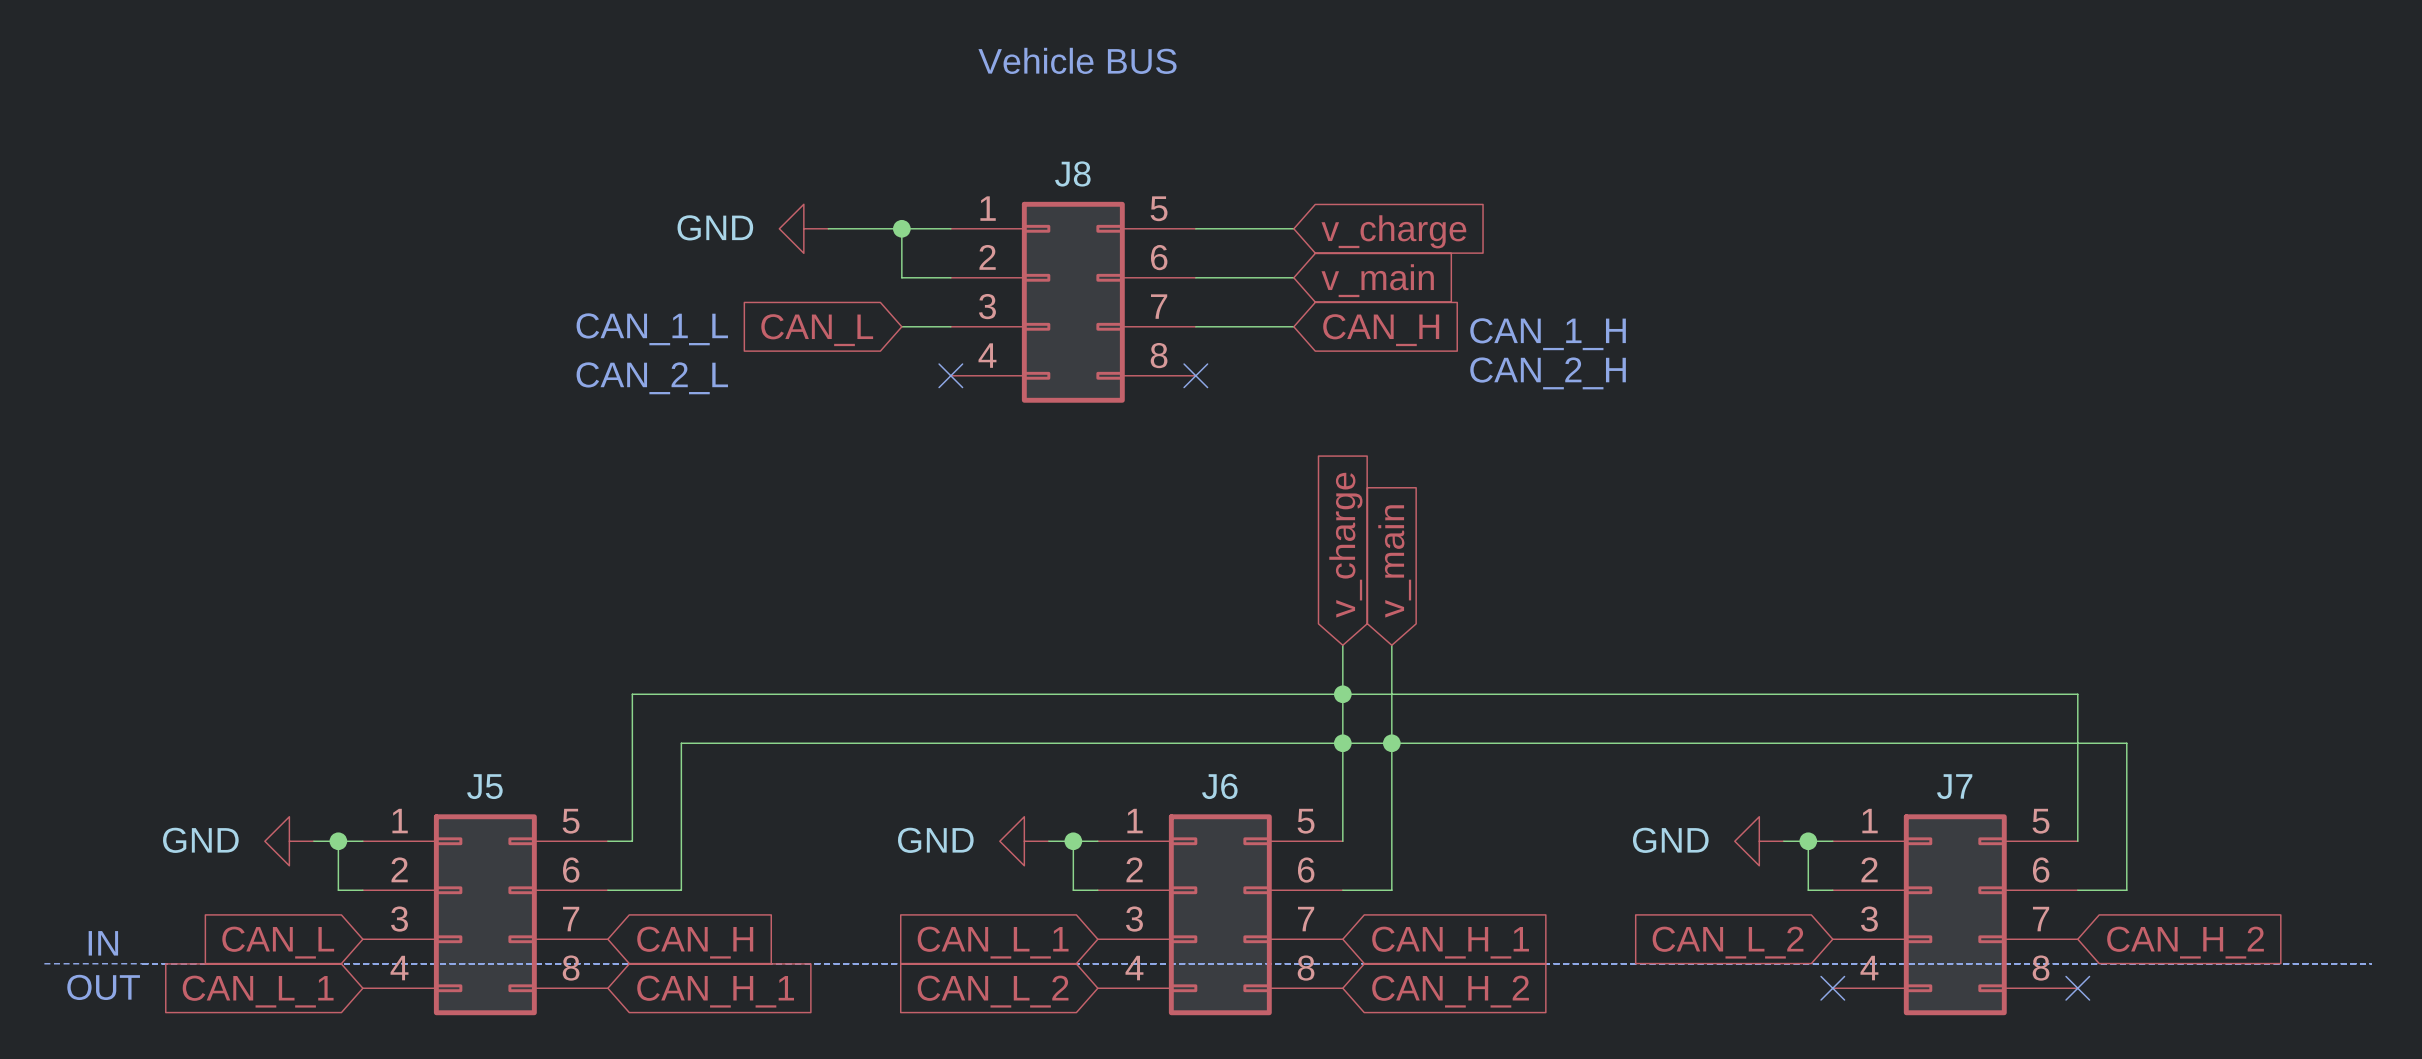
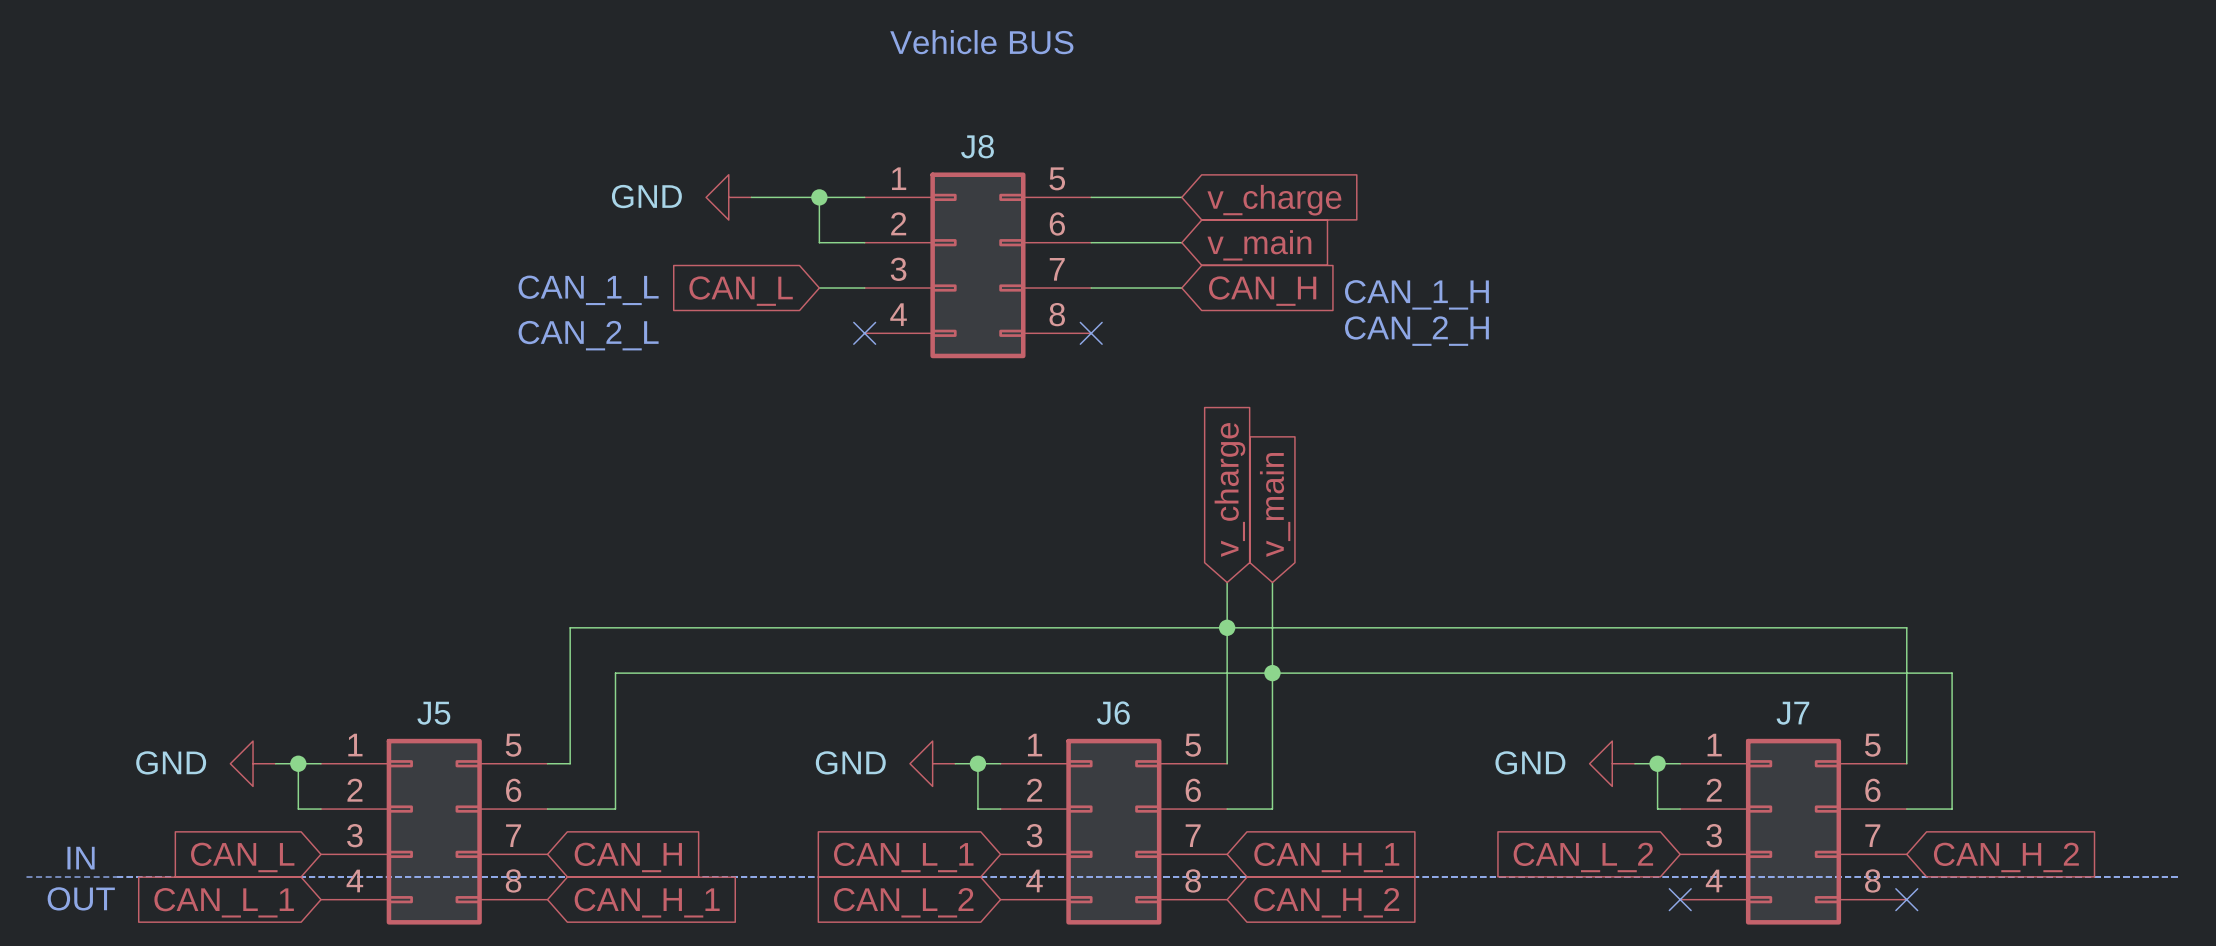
junction: (1342, 743) -> none

